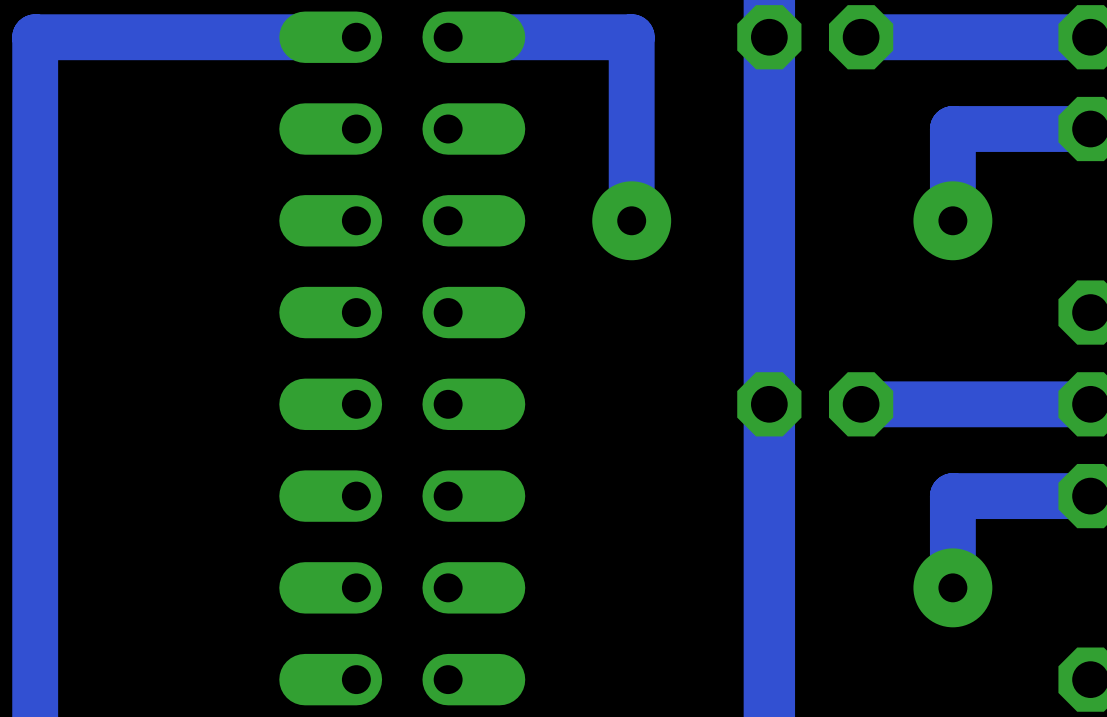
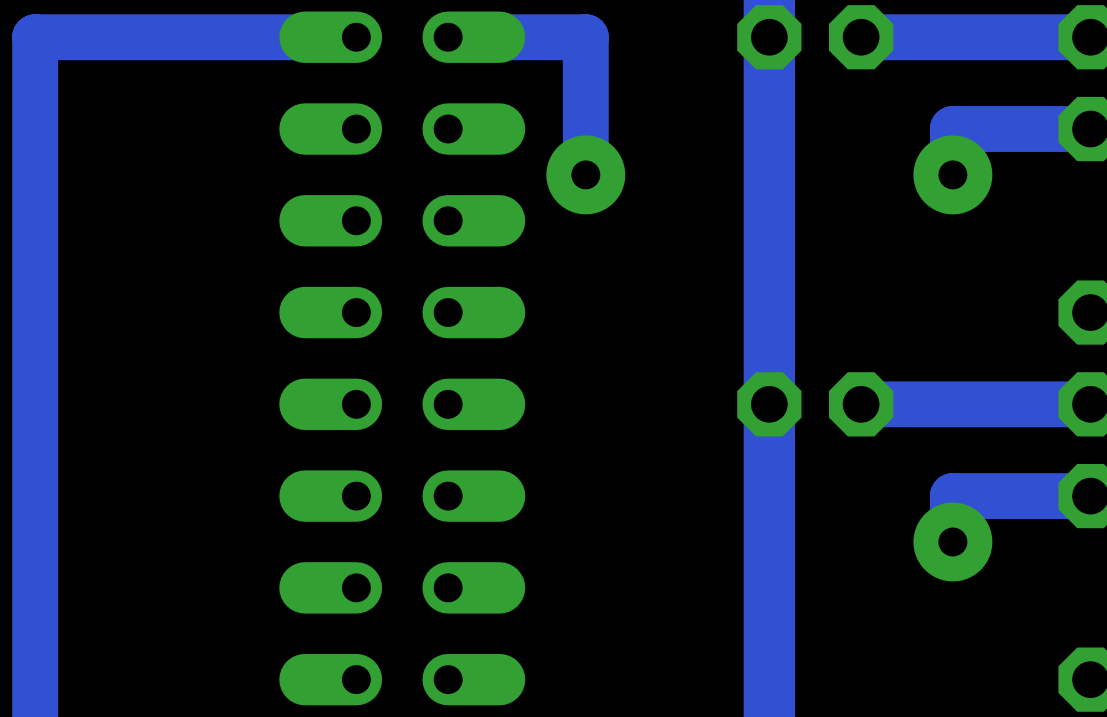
track: (585, 37) (631, 37) (631, 220) -> (585, 37) (585, 174)
via position: (631, 220) -> (585, 174)
via position: (952, 220) -> (952, 174)
via position: (952, 587) -> (952, 541)

